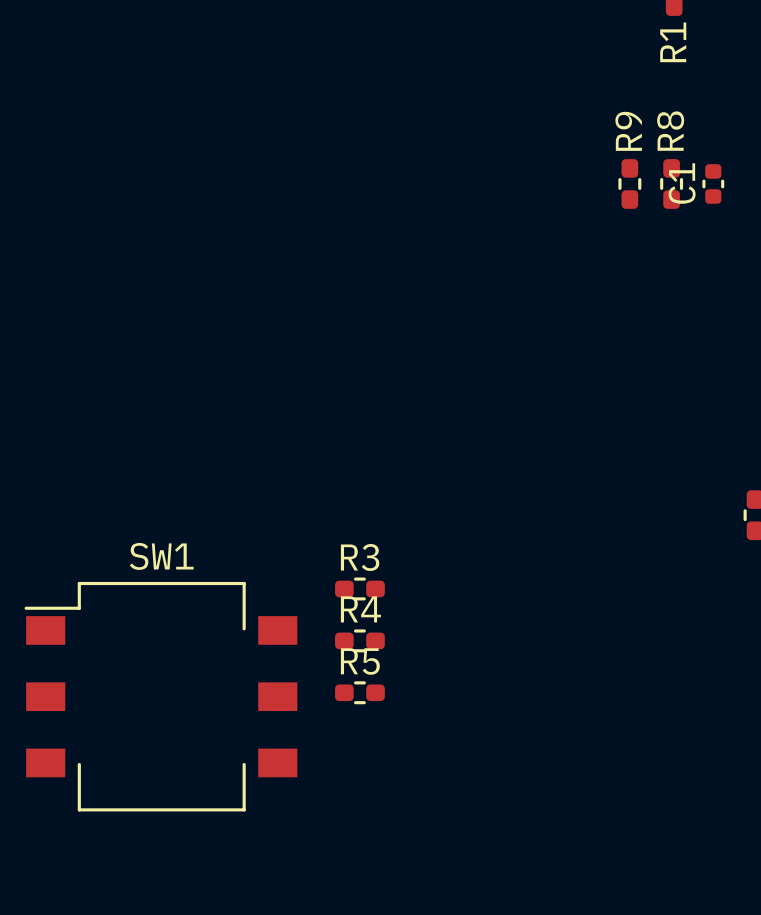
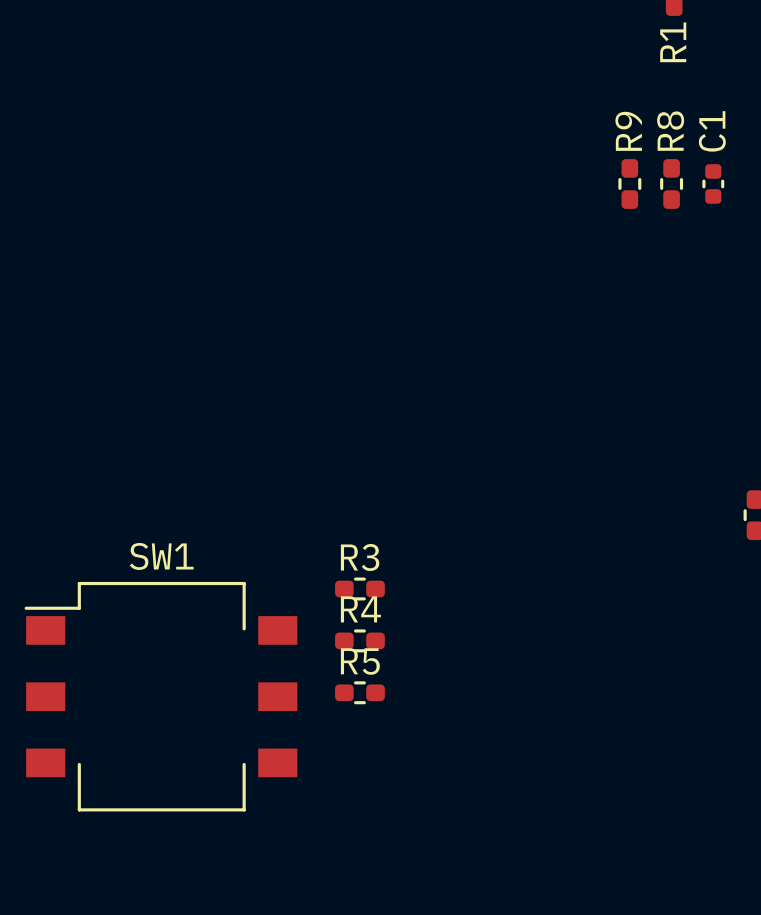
C1 name position: C1 (682, 183) -> C1 (712, 131)

